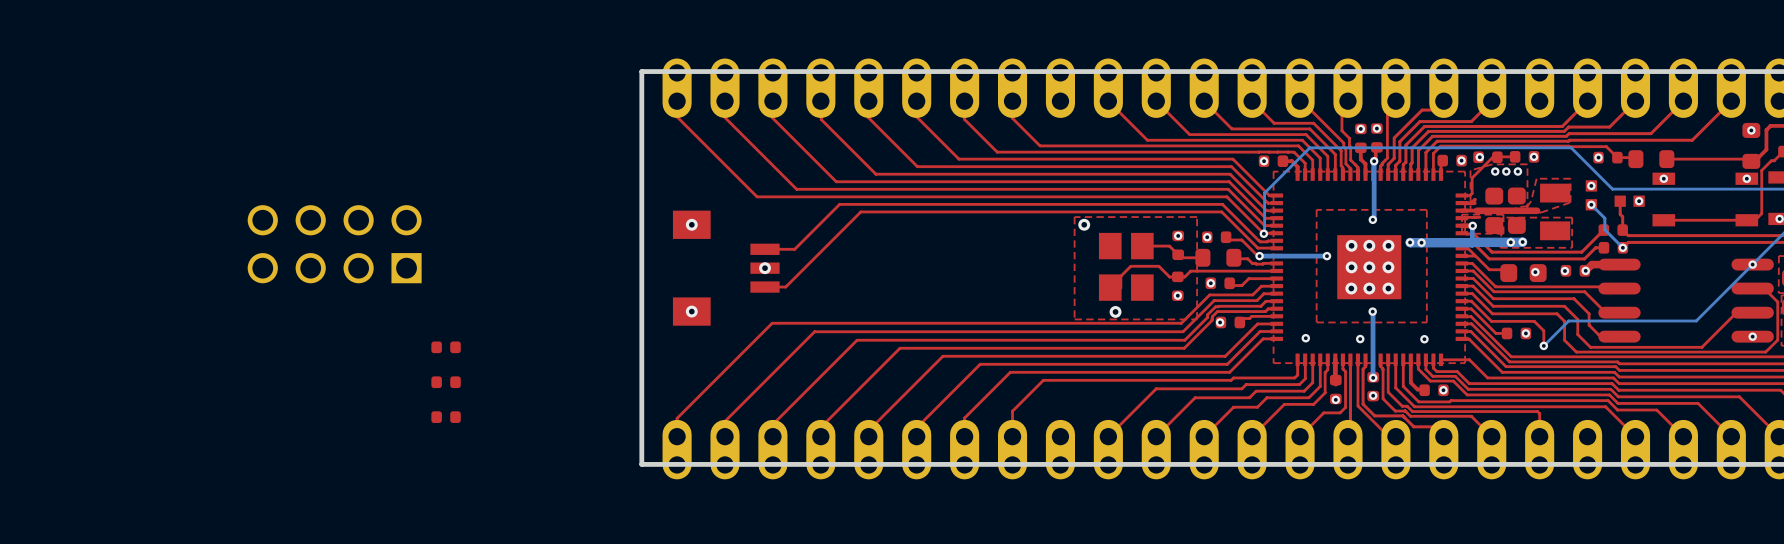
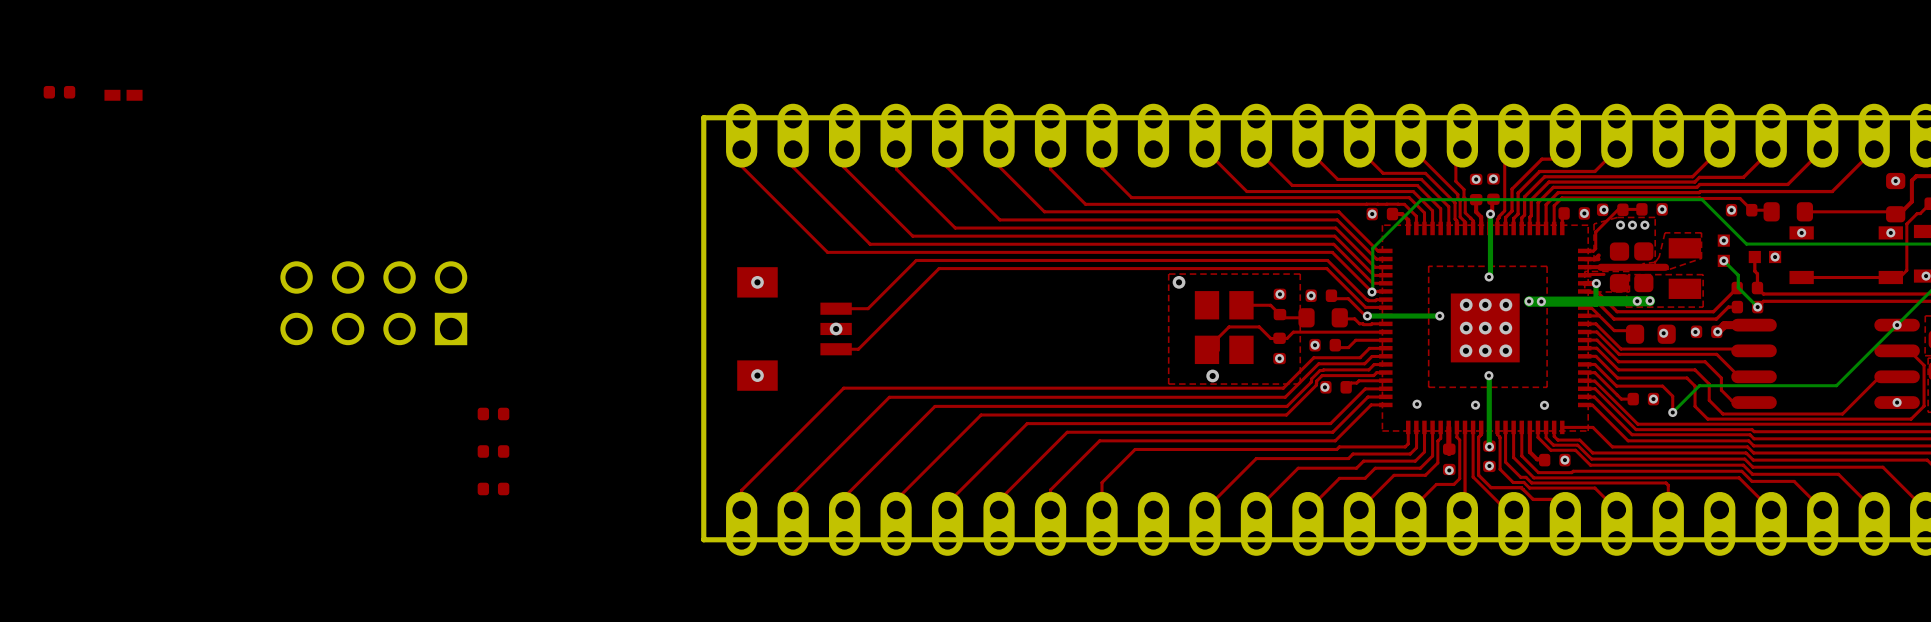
part: none -> (59, 92)
part: none -> (123, 95)

